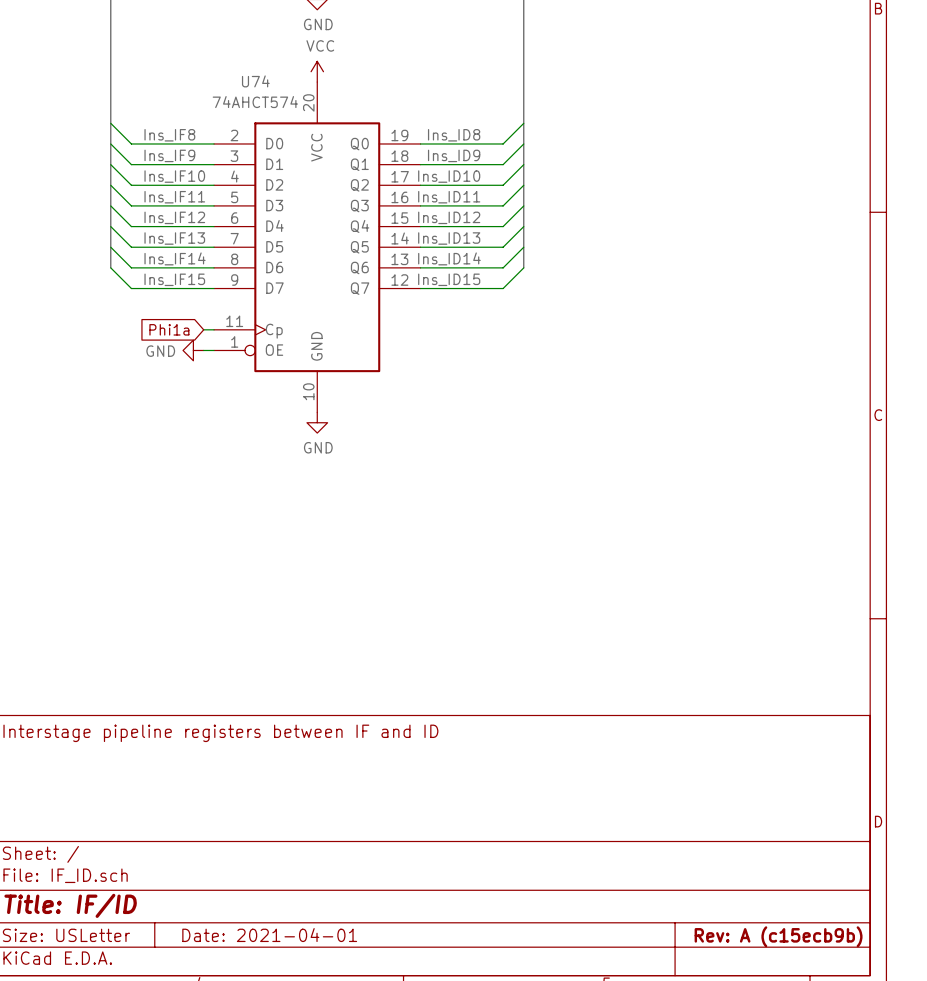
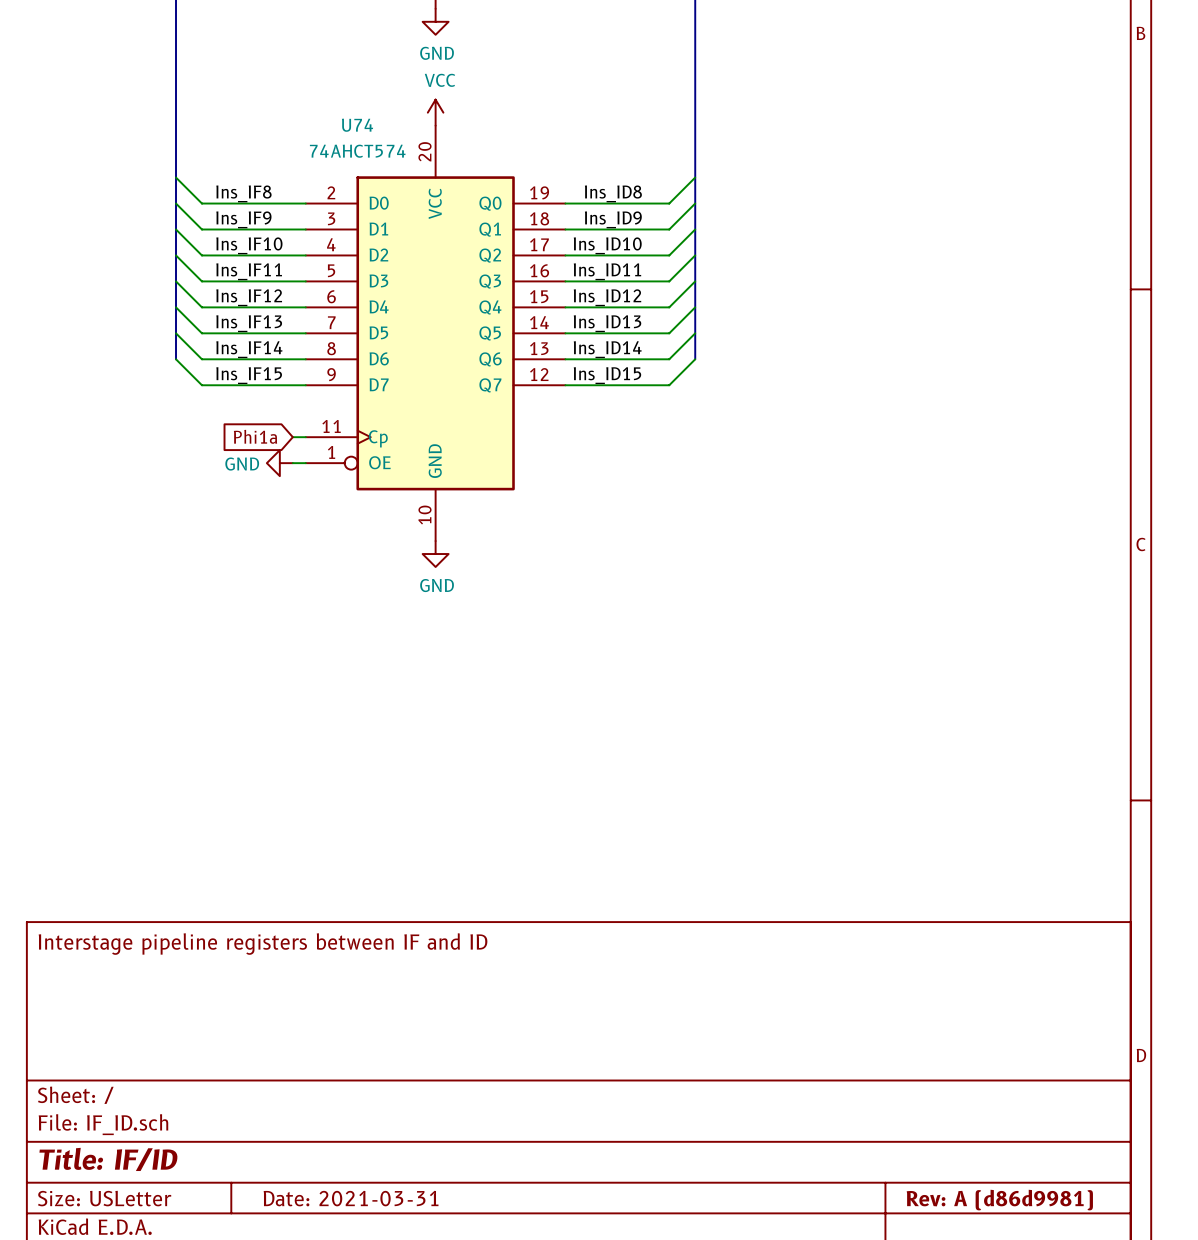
title block: Date: 2021-04-01 (269, 935) -> Date: 2021-03-31 (351, 1198)
title block: Rev: A (c15ecb9b) (778, 936) -> Rev: A (d86d9981) (999, 1200)

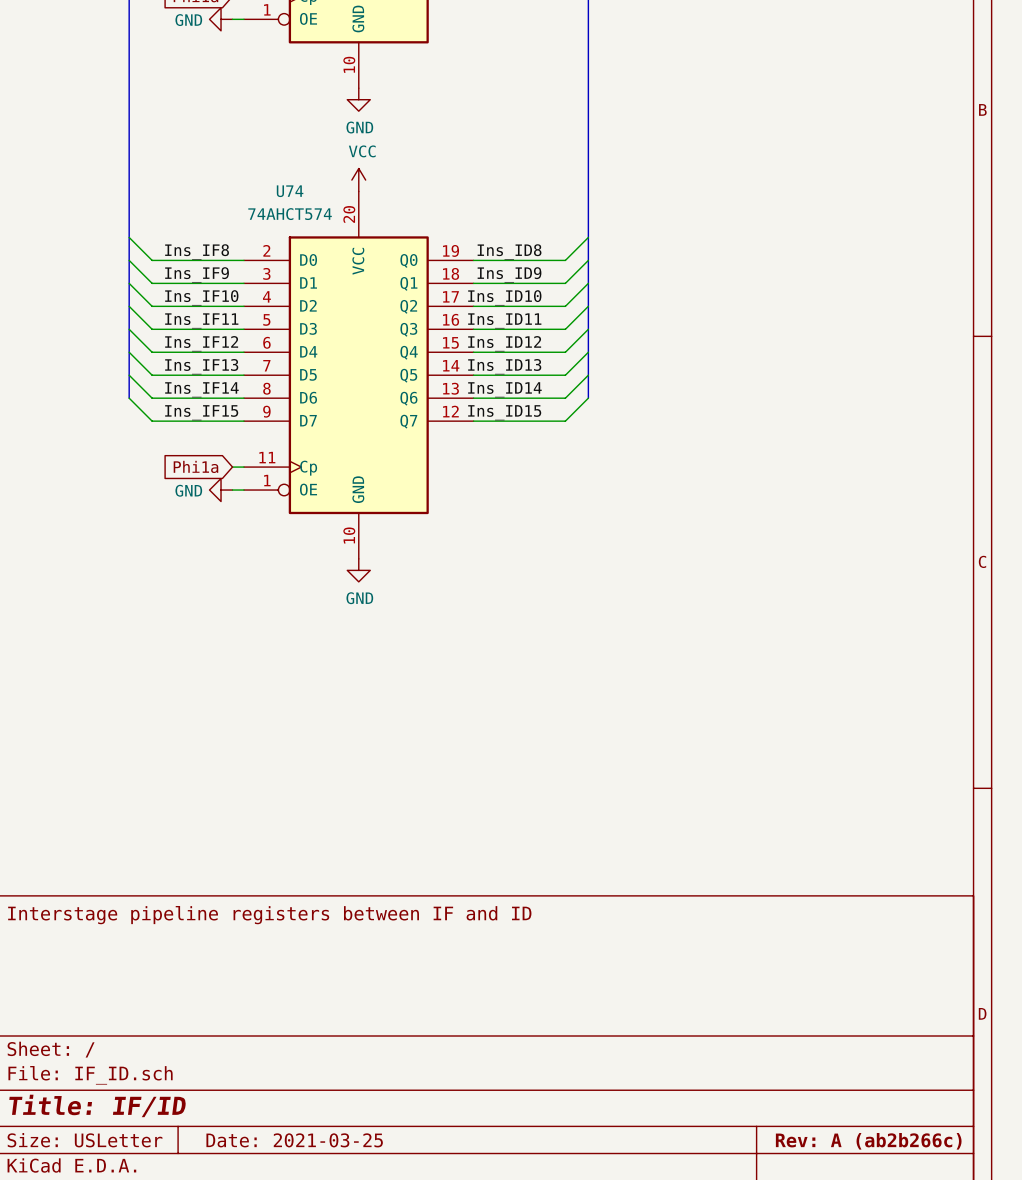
title block: Date: 2021-03-31 (351, 1198) -> Date: 2021-03-25 (294, 1140)
title block: Rev: A (d86d9981) (999, 1200) -> Rev: A (ab2b266c) (868, 1141)

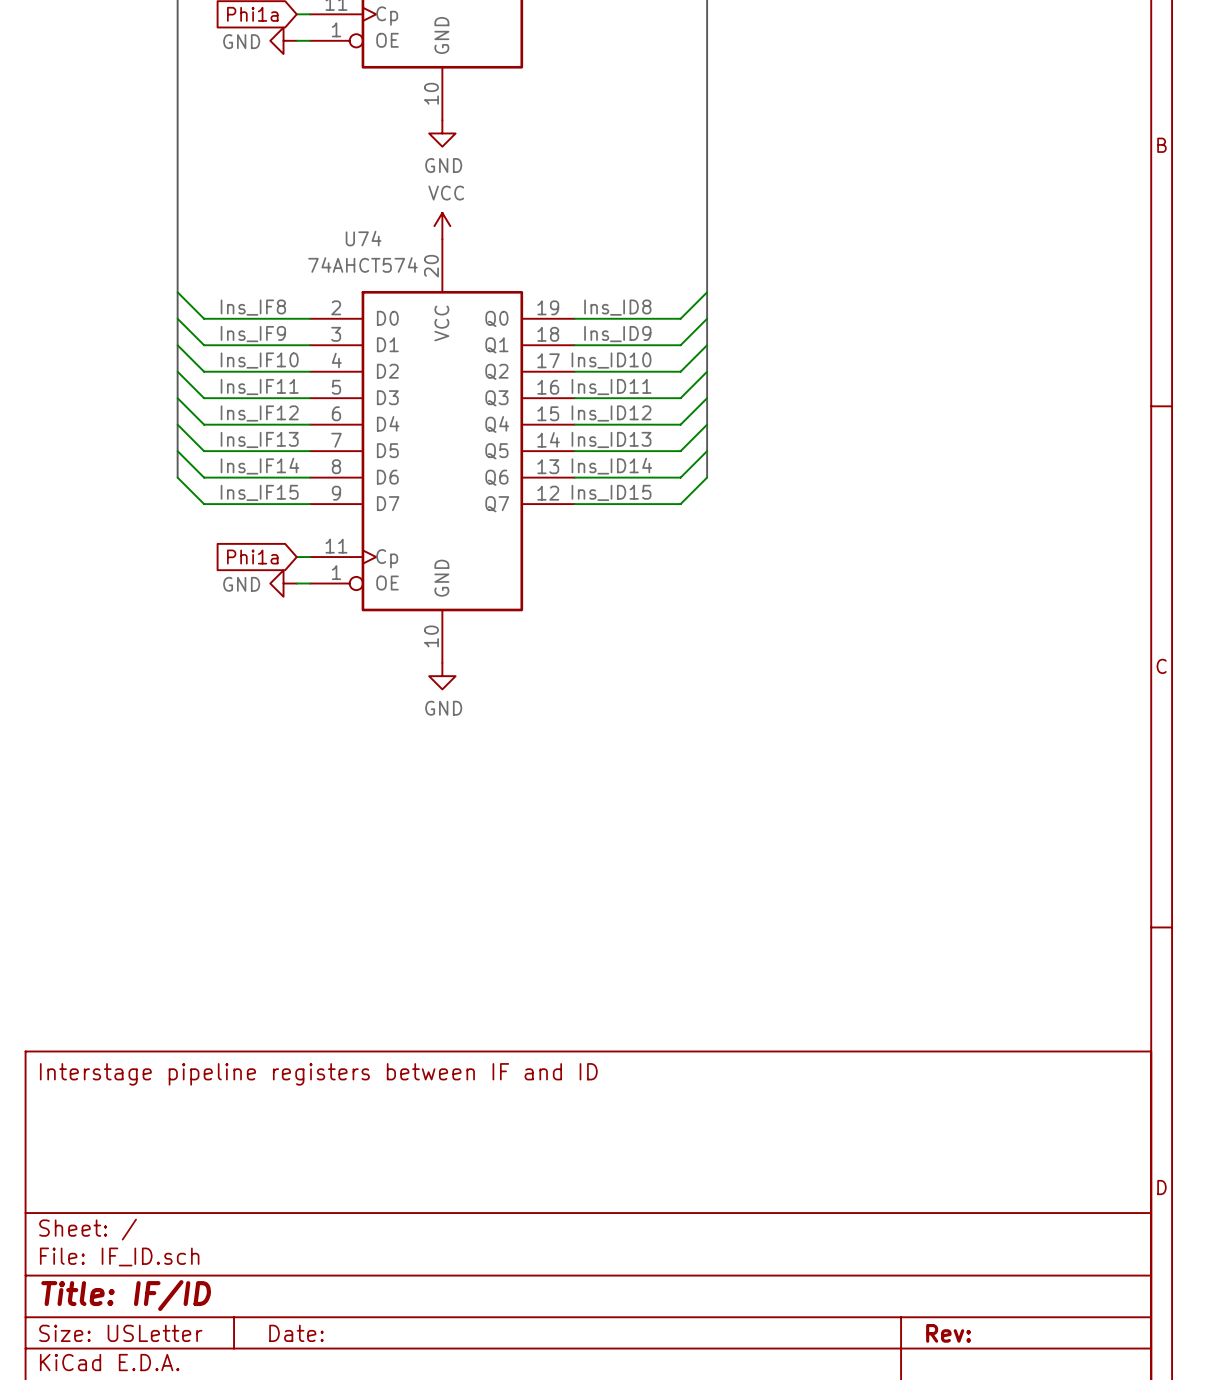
title block: Date: 2021-03-25 (294, 1140) -> Date: (296, 1333)
title block: Rev: A (ab2b266c) (868, 1141) -> Rev: (948, 1333)

